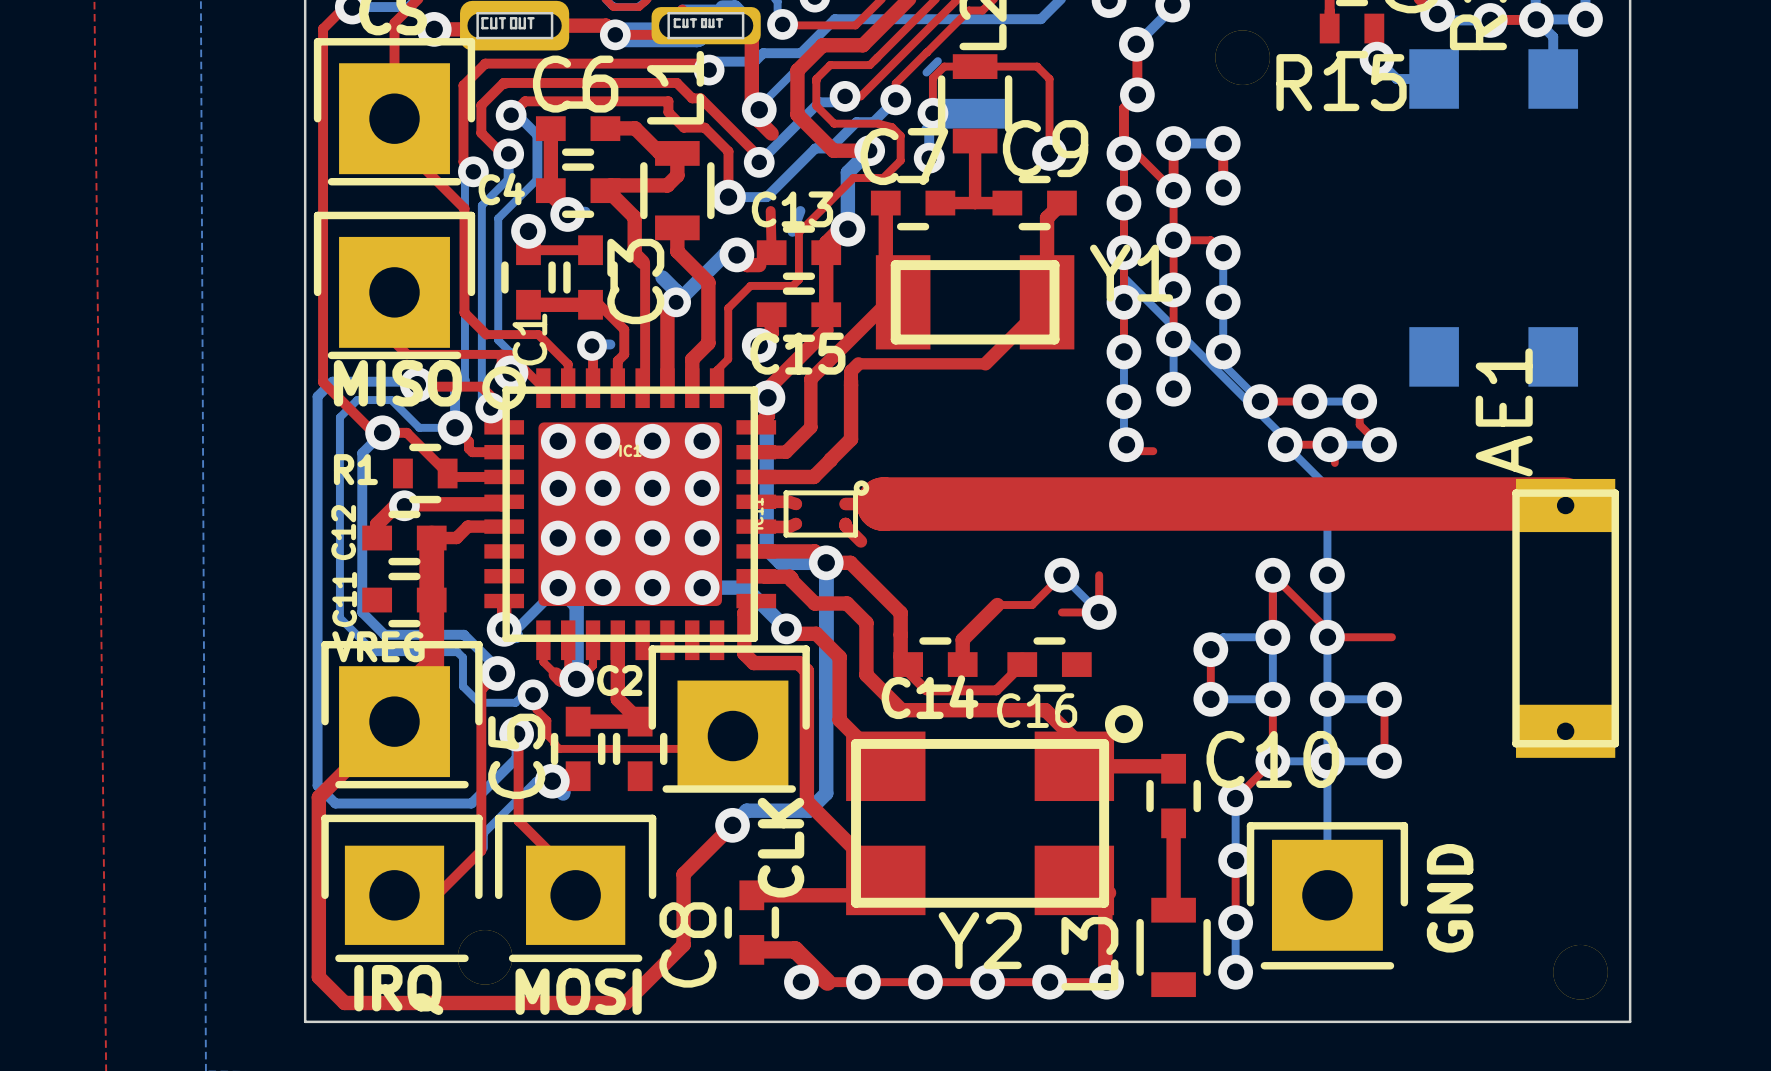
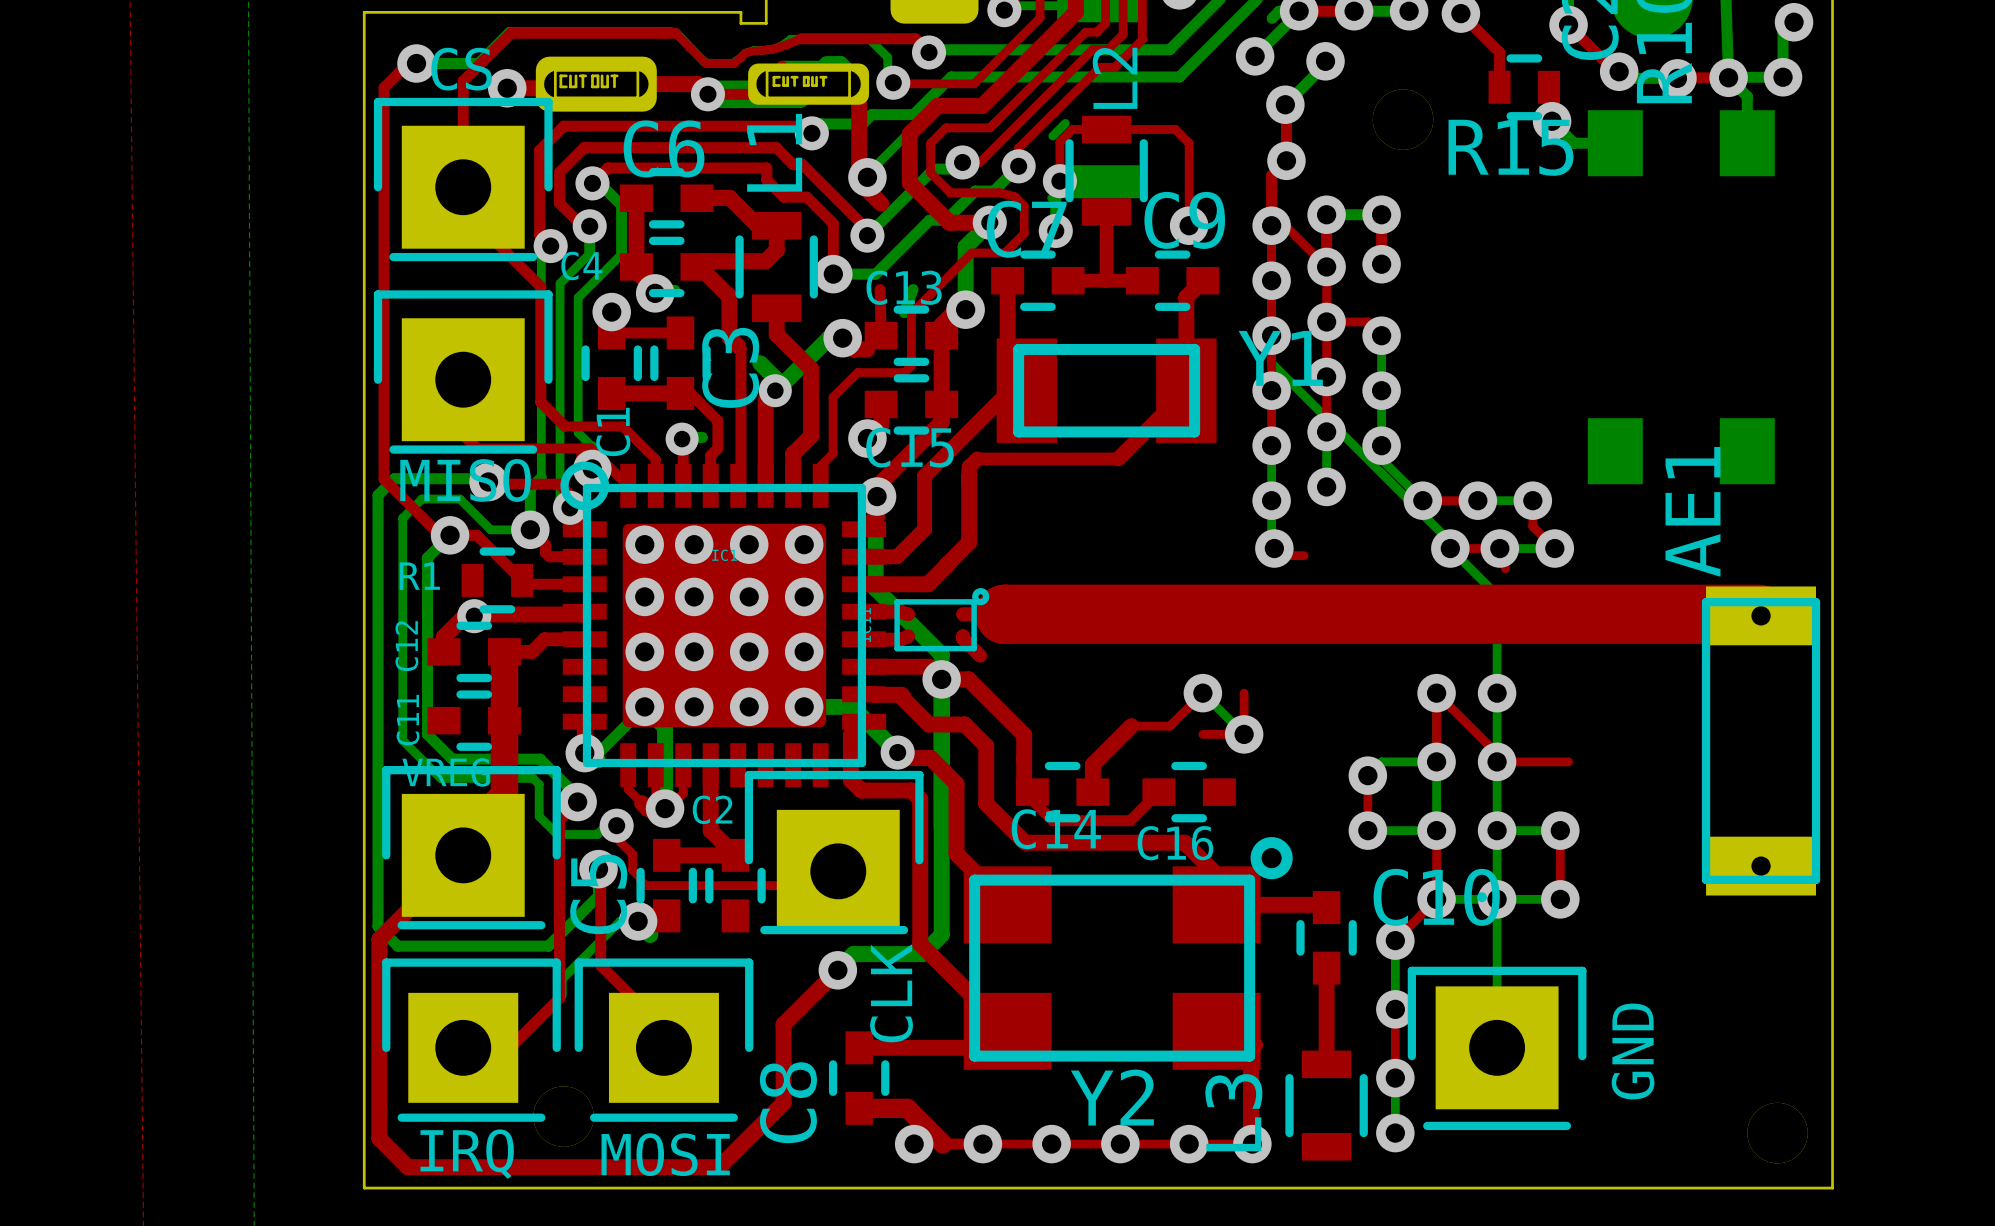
bottom track: (766, 480) (766, 548) (780, 562) (826, 562) -> (875, 588) (941, 654) (941, 679)

